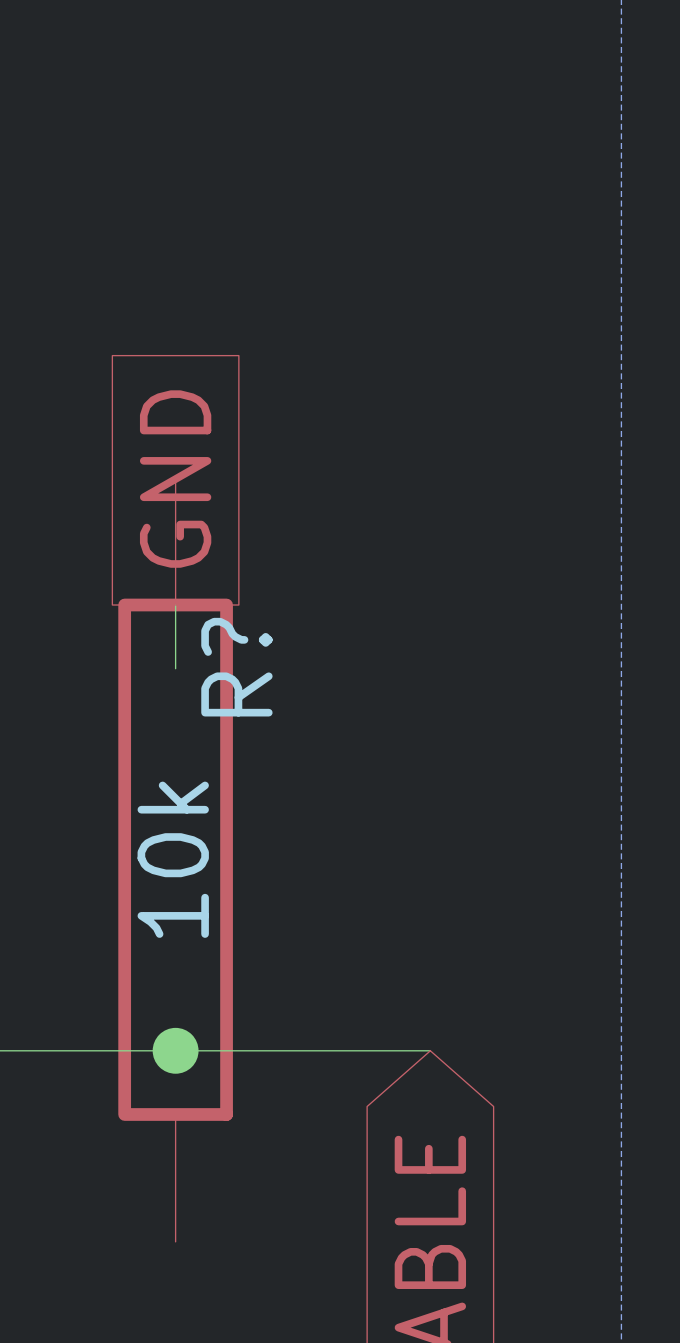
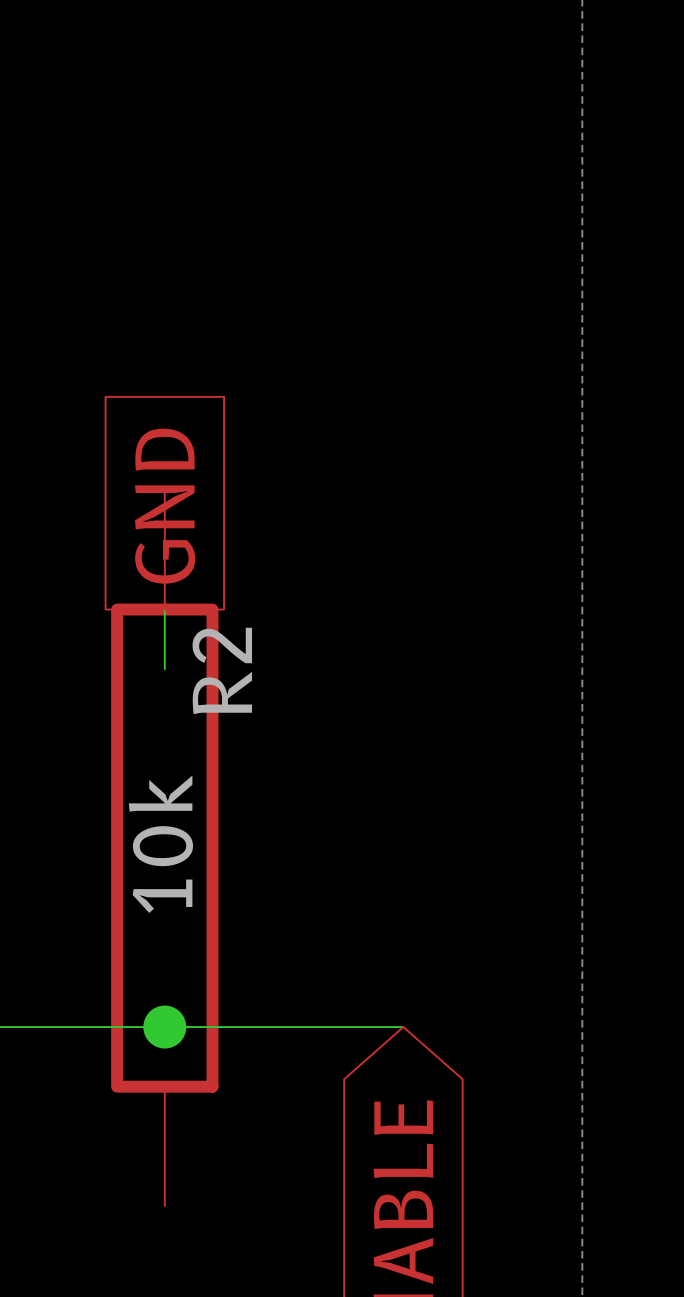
R? name: R? (236, 667) -> R2 (222, 670)

